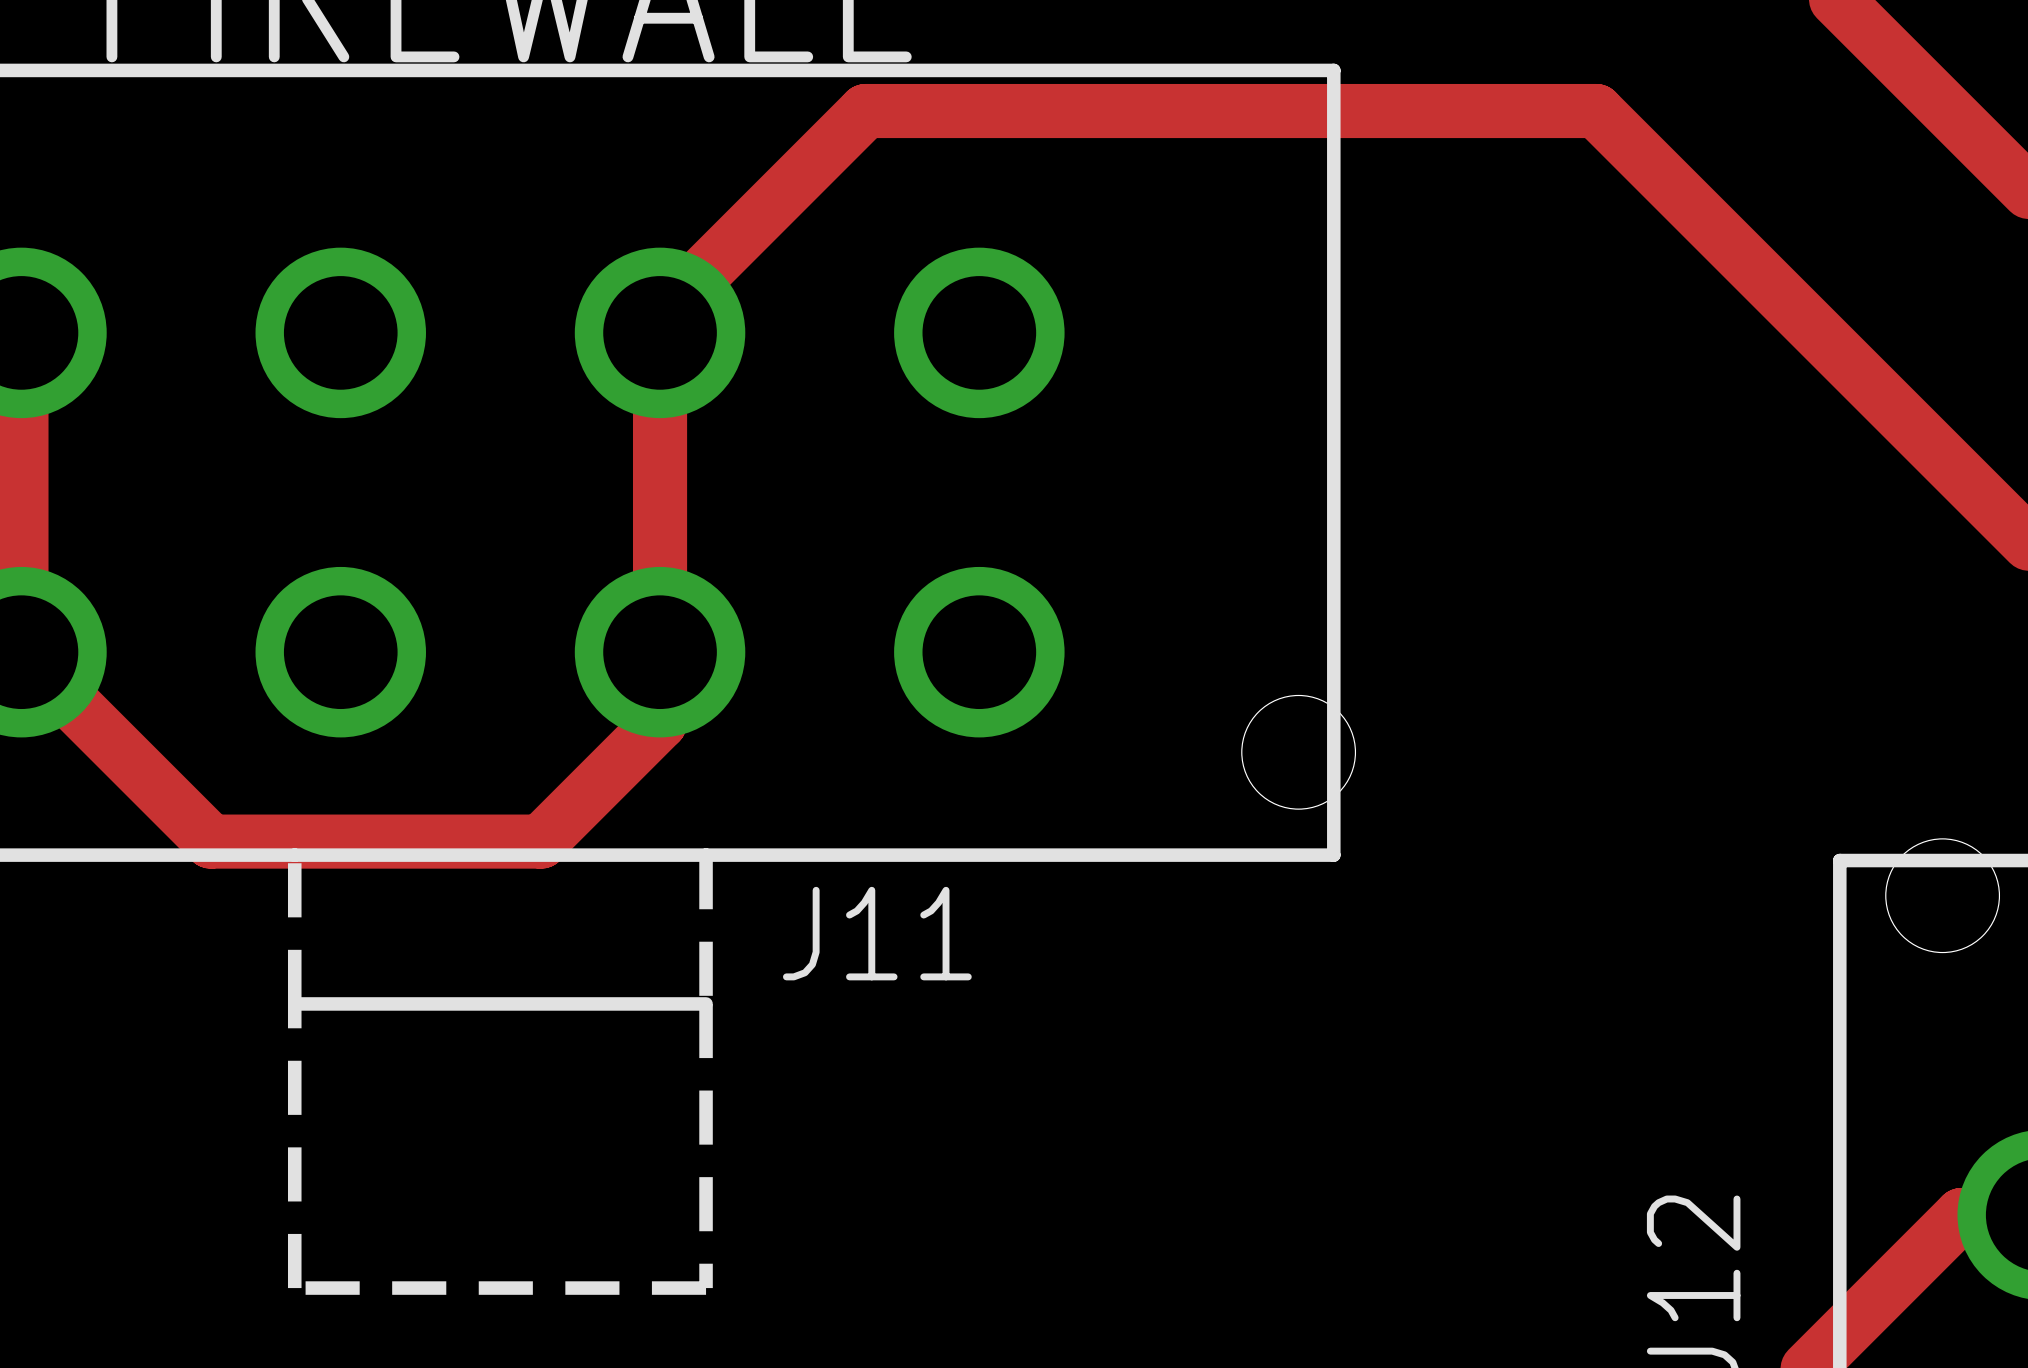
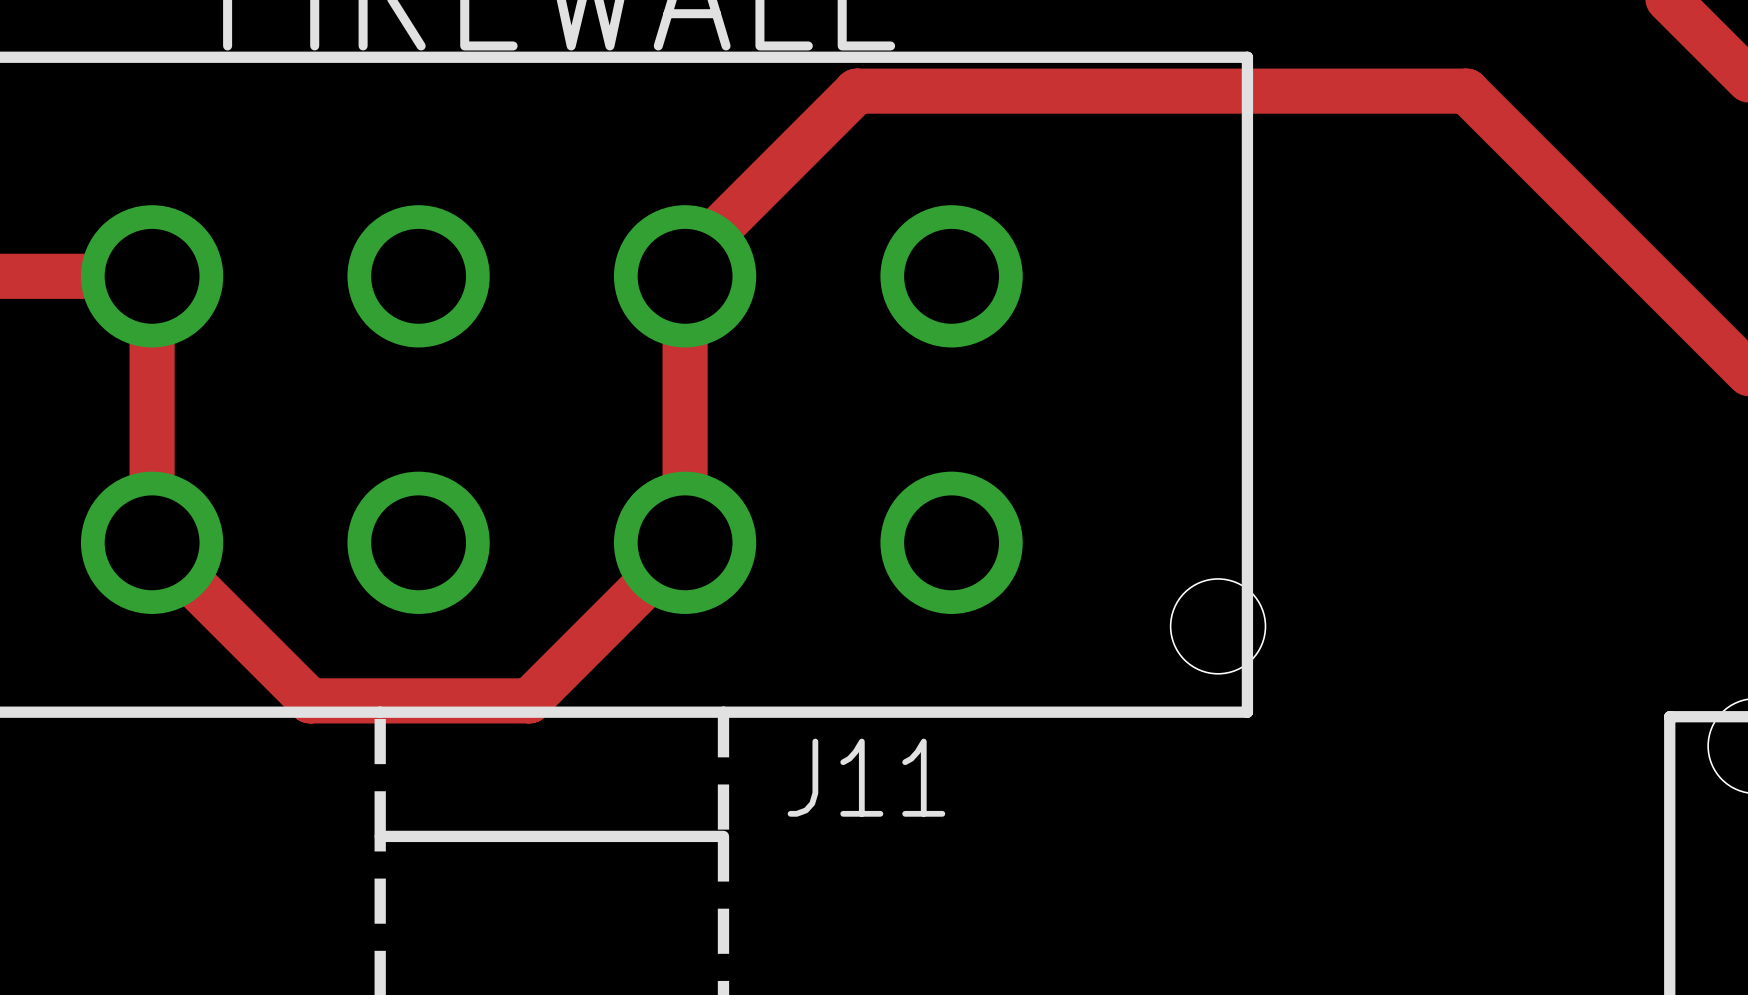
top track: (660, 654) (660, 722) (540, 841) (473, 841) -> (685, 545) (529, 700)

